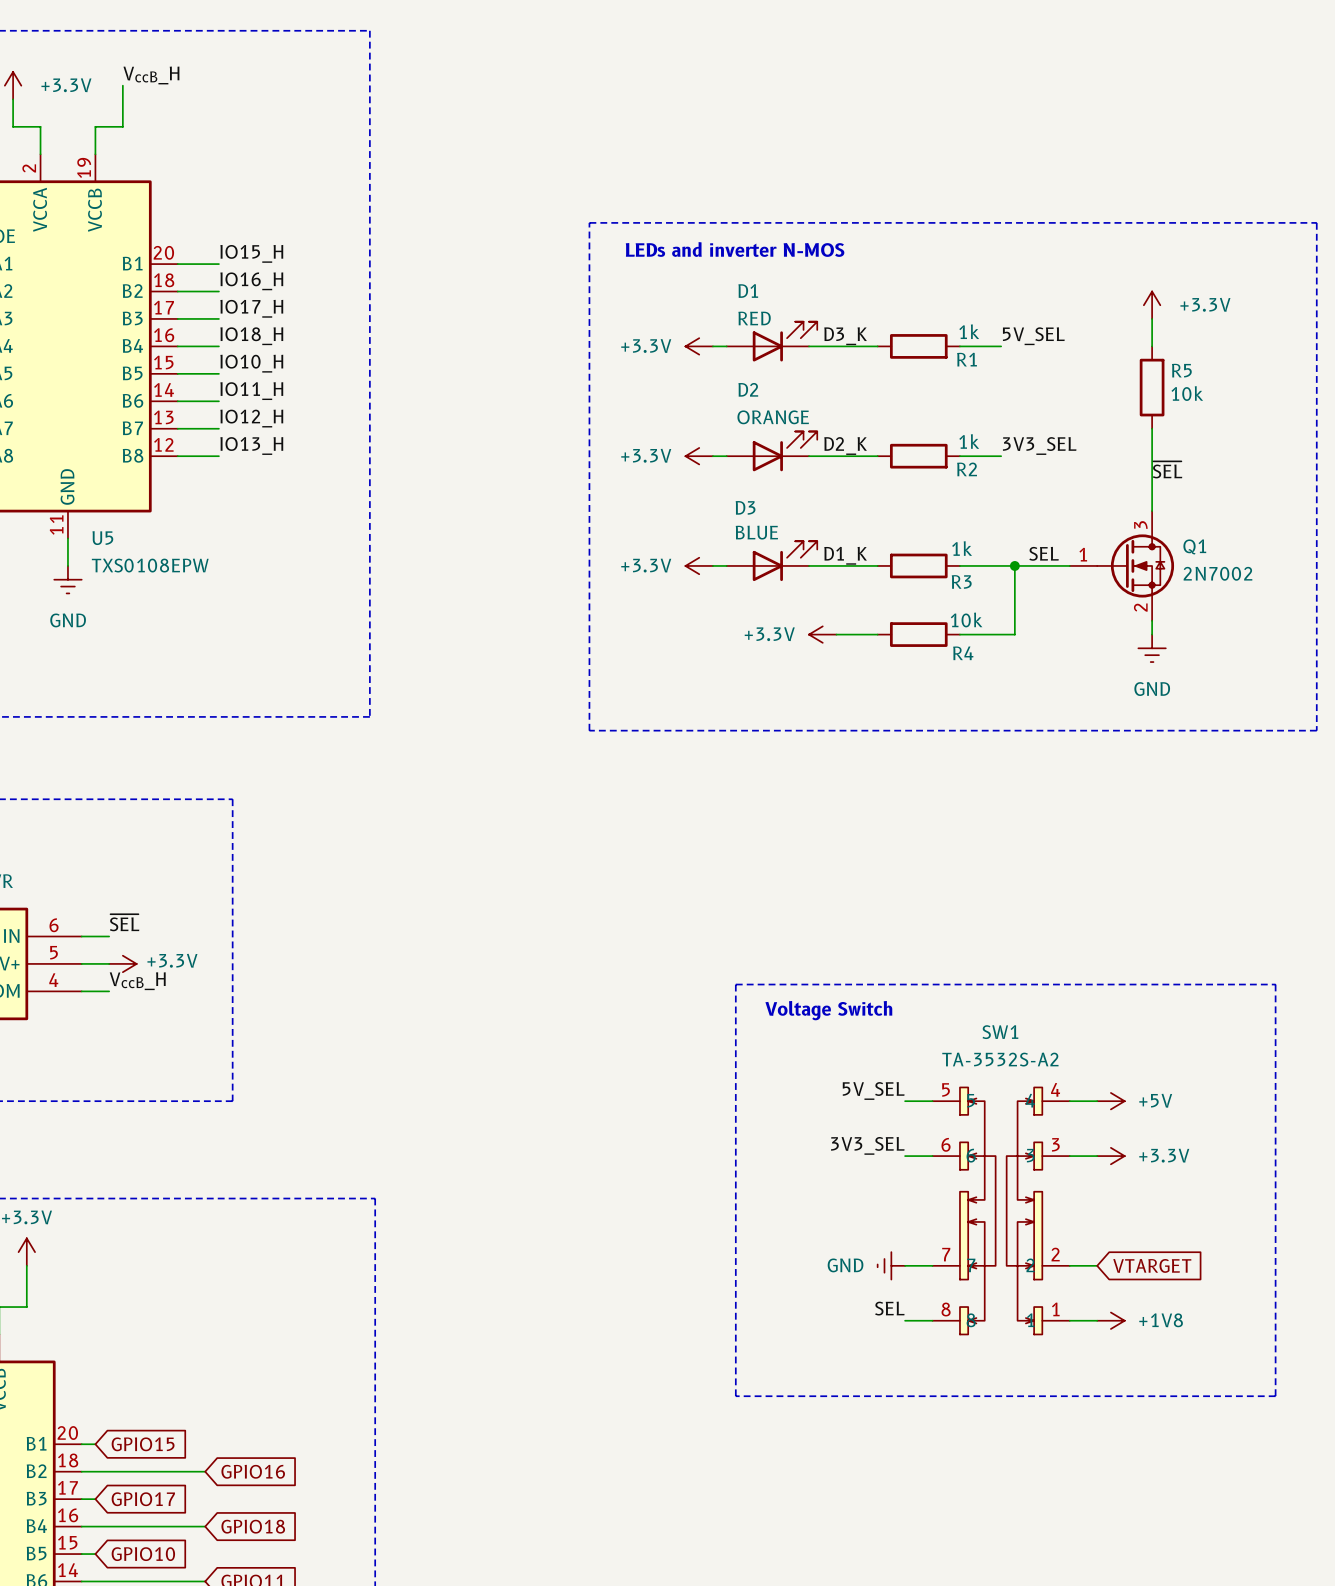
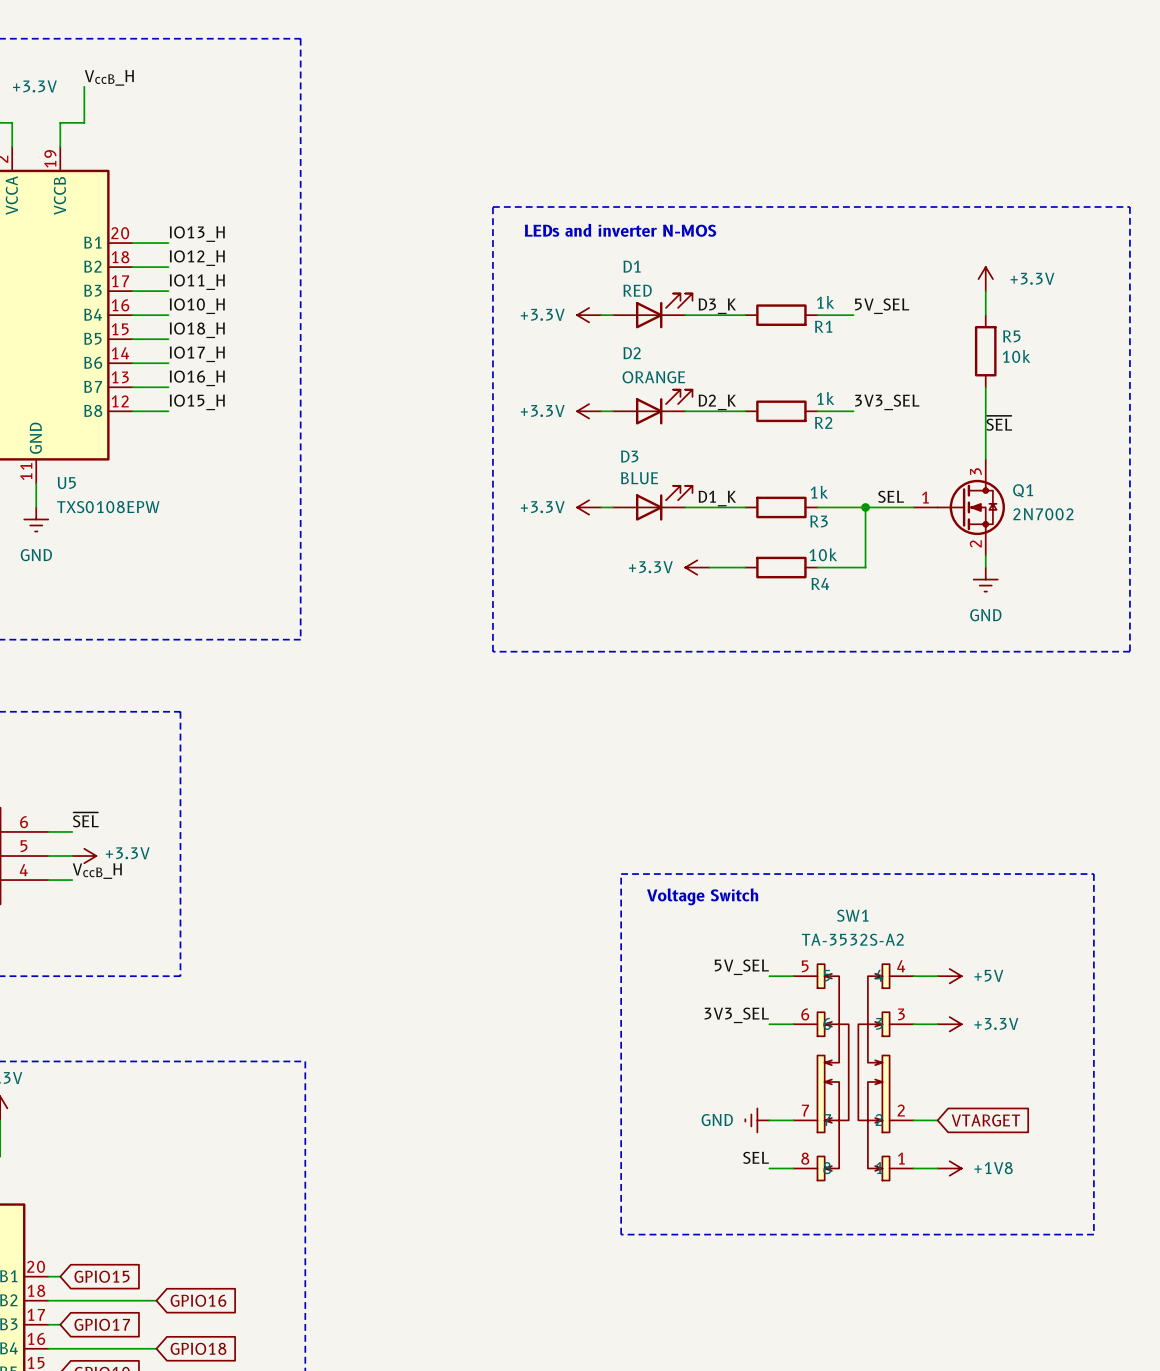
label: IO15_H (251, 253) -> IO13_H (197, 234)
label: IO16_H (251, 281) -> IO12_H (197, 258)
label: IO17_H (251, 308) -> IO11_H (197, 282)
label: IO18_H (251, 336) -> IO10_H (197, 306)
label: IO10_H (251, 363) -> IO18_H (197, 330)
label: IO11_H (251, 391) -> IO17_H (197, 354)
label: IO12_H (251, 418) -> IO16_H (197, 378)
label: IO13_H (251, 446) -> IO15_H (197, 402)

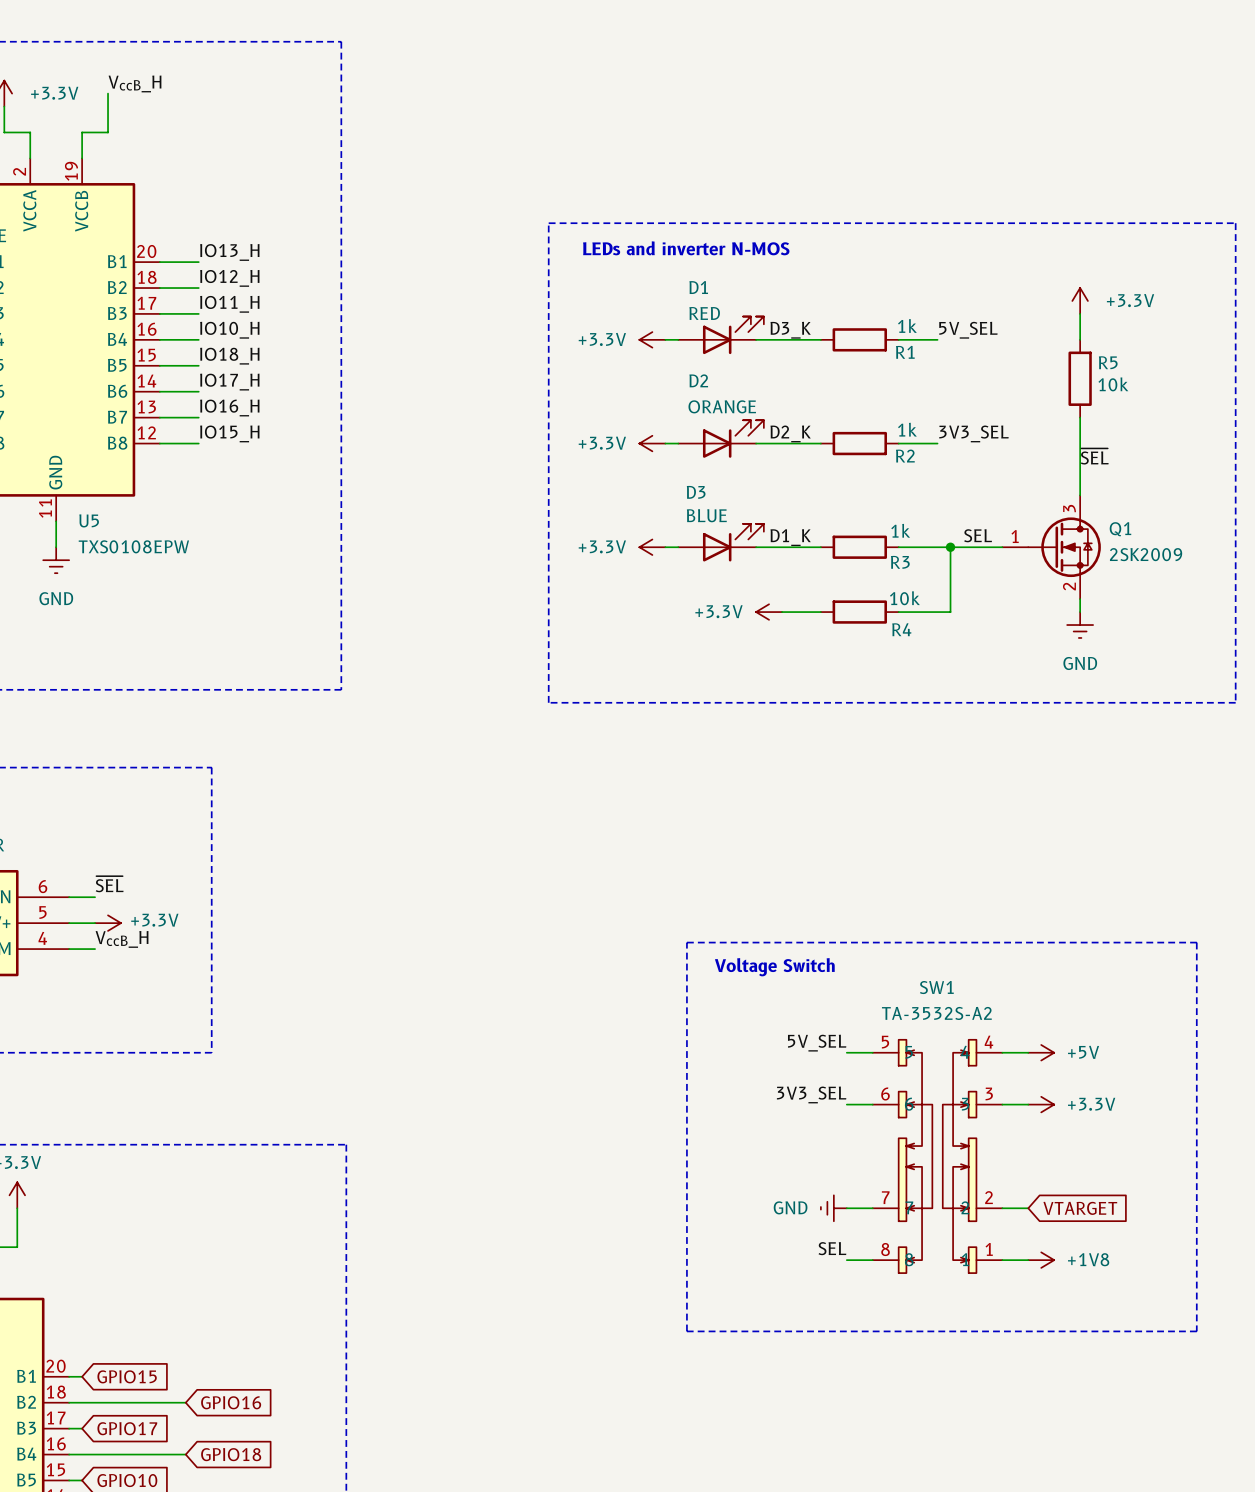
Q1 value: 2N7002 (1043, 514) -> 2SK2009 (1146, 554)

